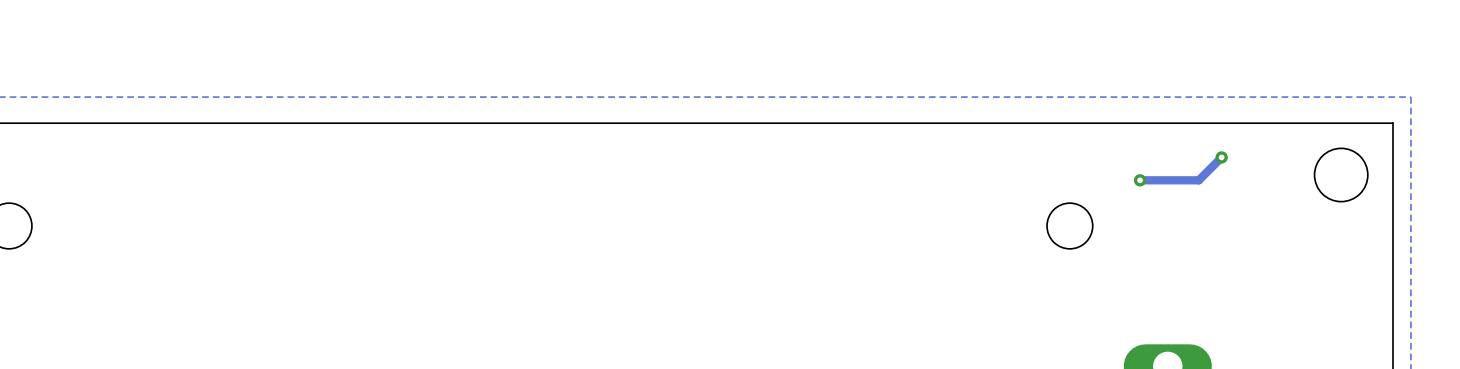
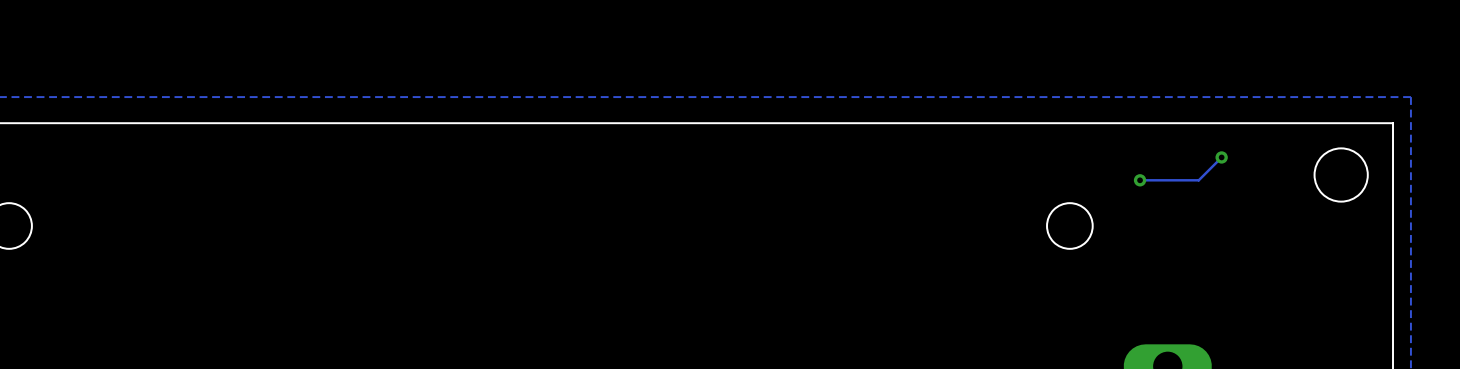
track width: thick (1221, 157) (1198, 180) (1140, 180) -> thin (1221, 157) (1198, 180) (1140, 180)

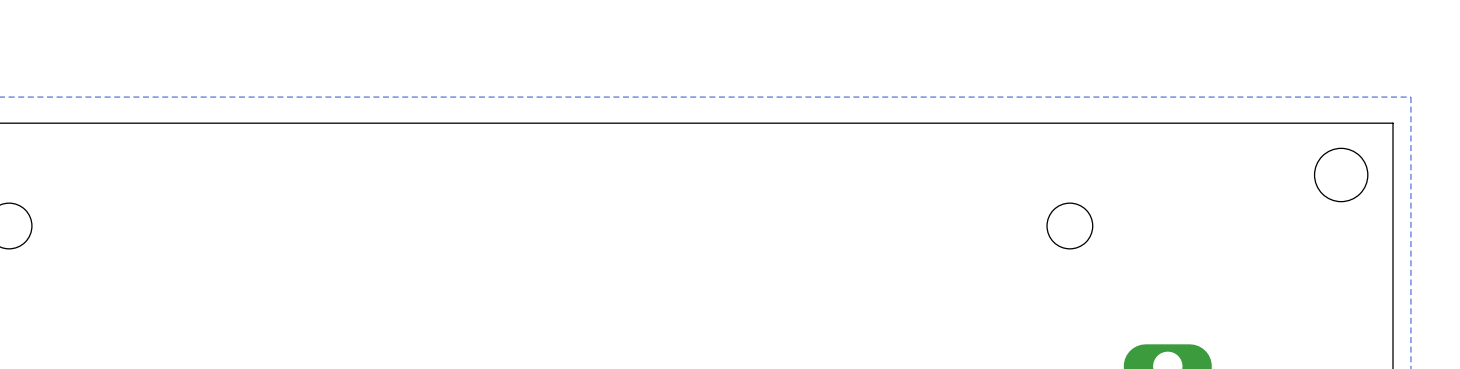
track: (1221, 157) (1198, 180) (1140, 180) -> none
via: (1221, 157) -> none
via: (1140, 180) -> none

